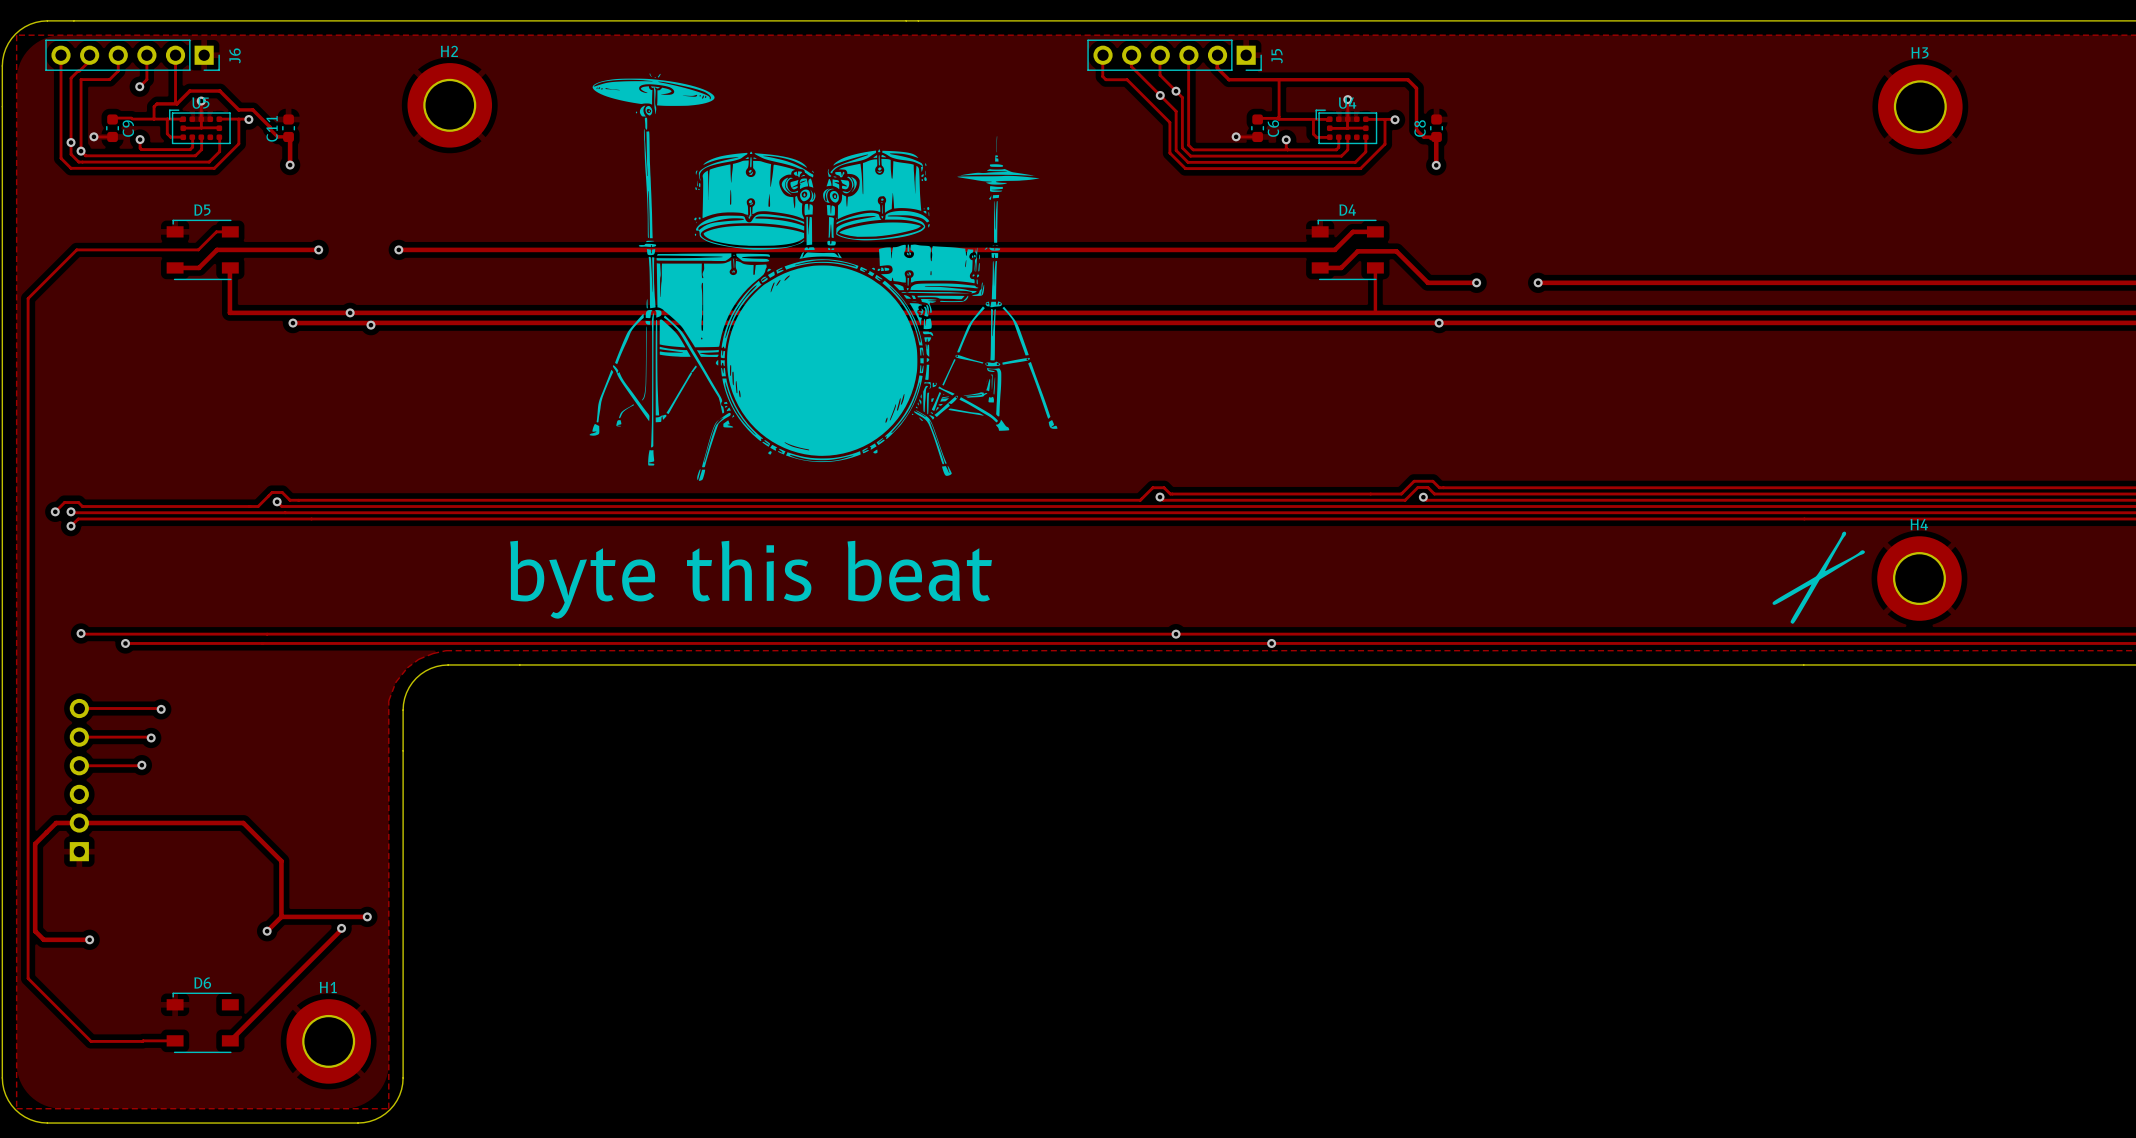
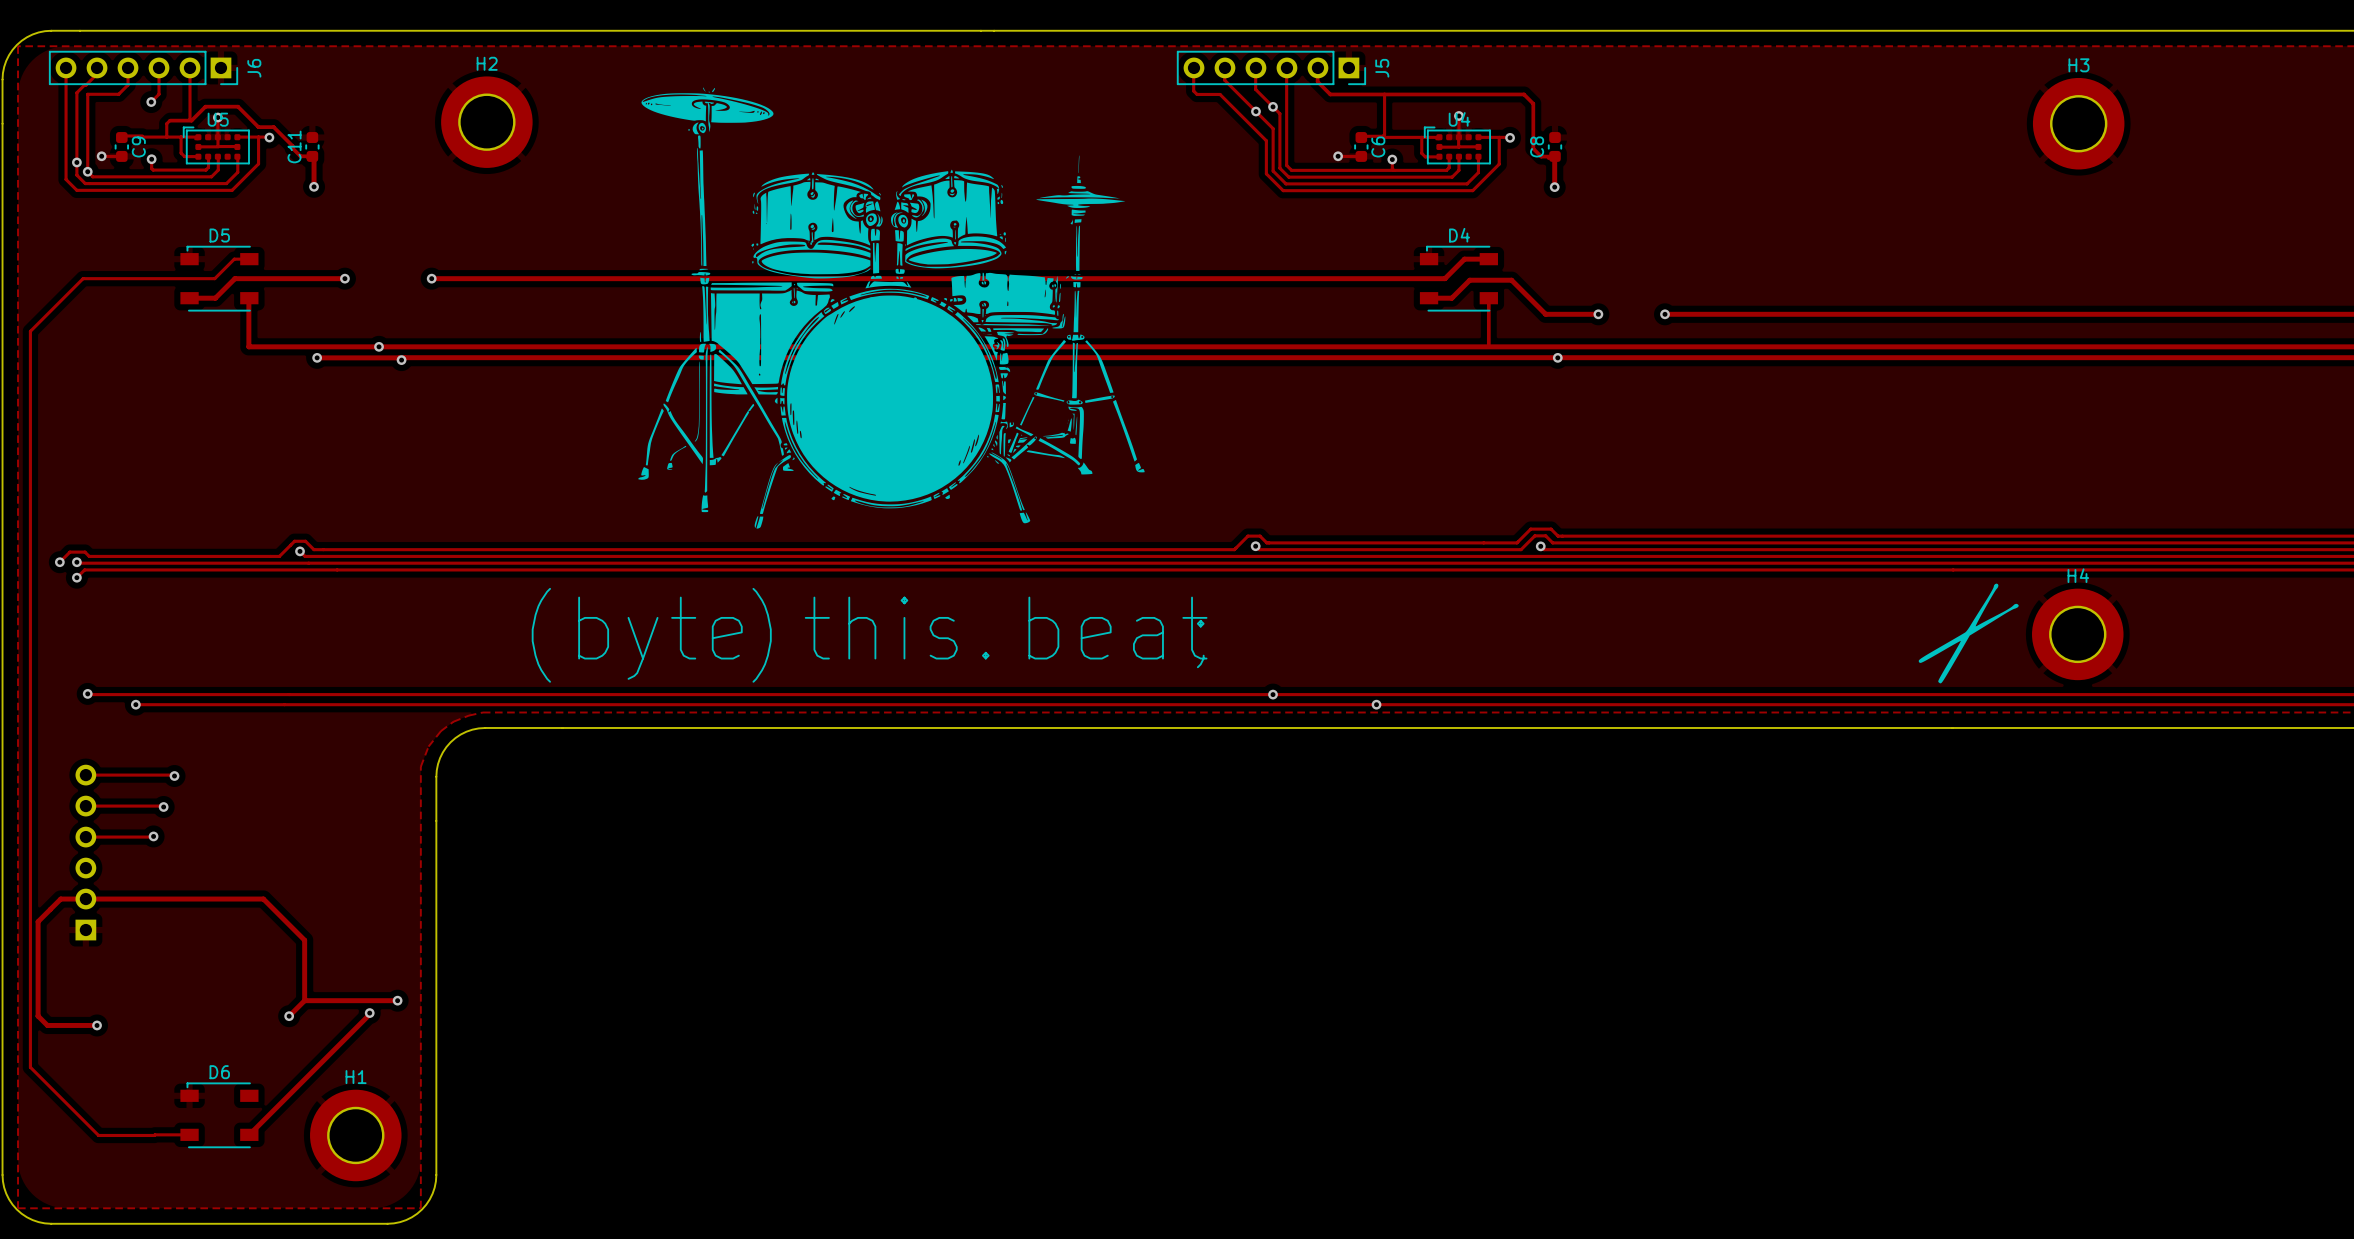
text: none -> ( ) . ; (868, 635)

